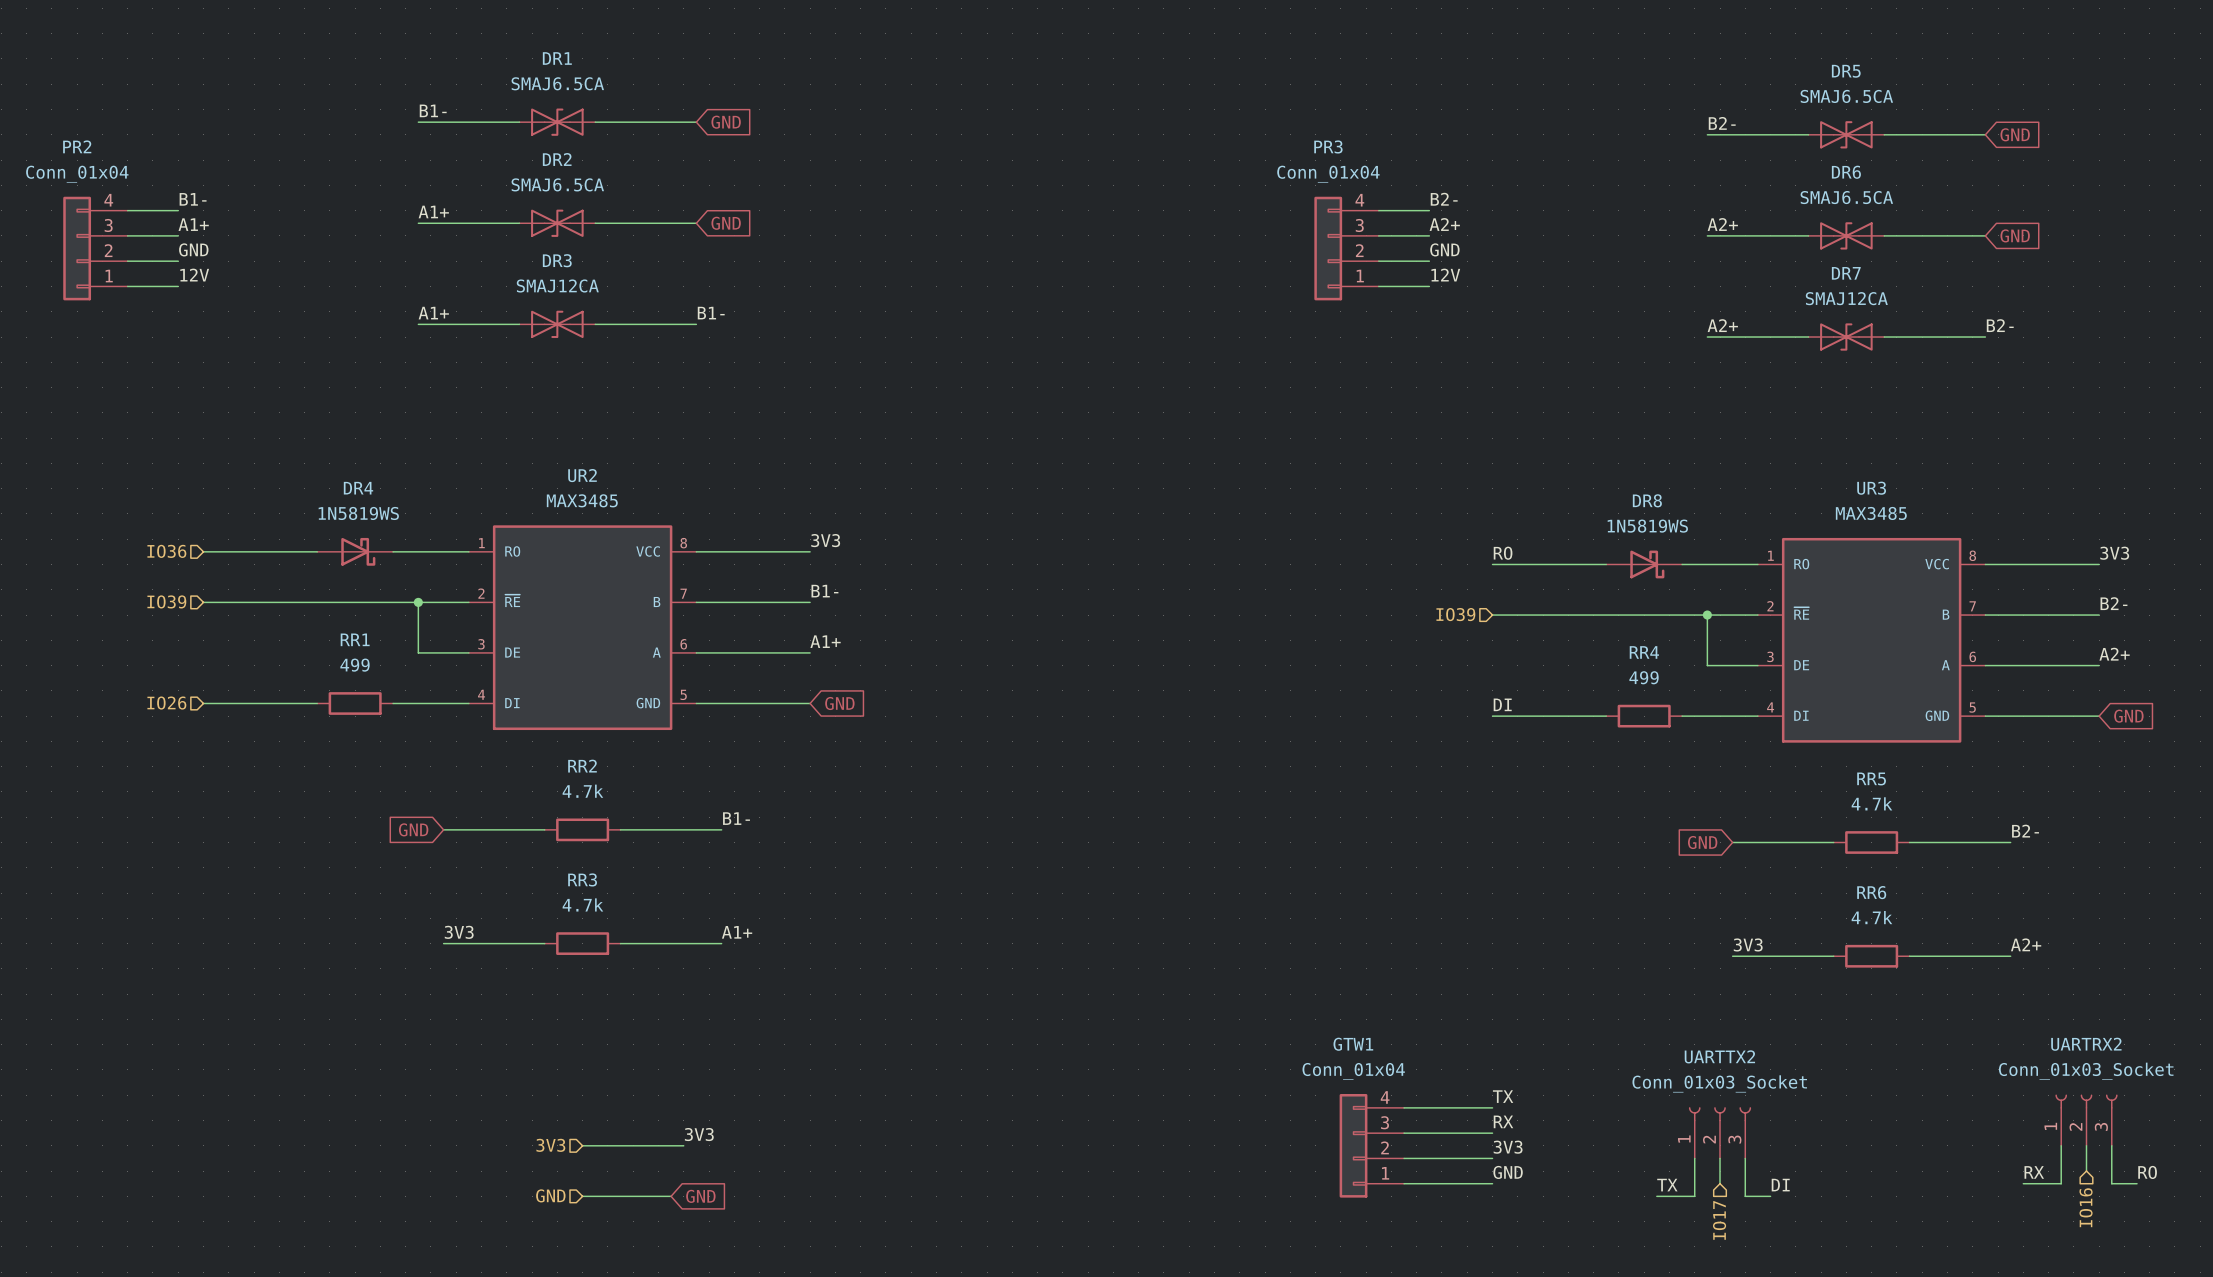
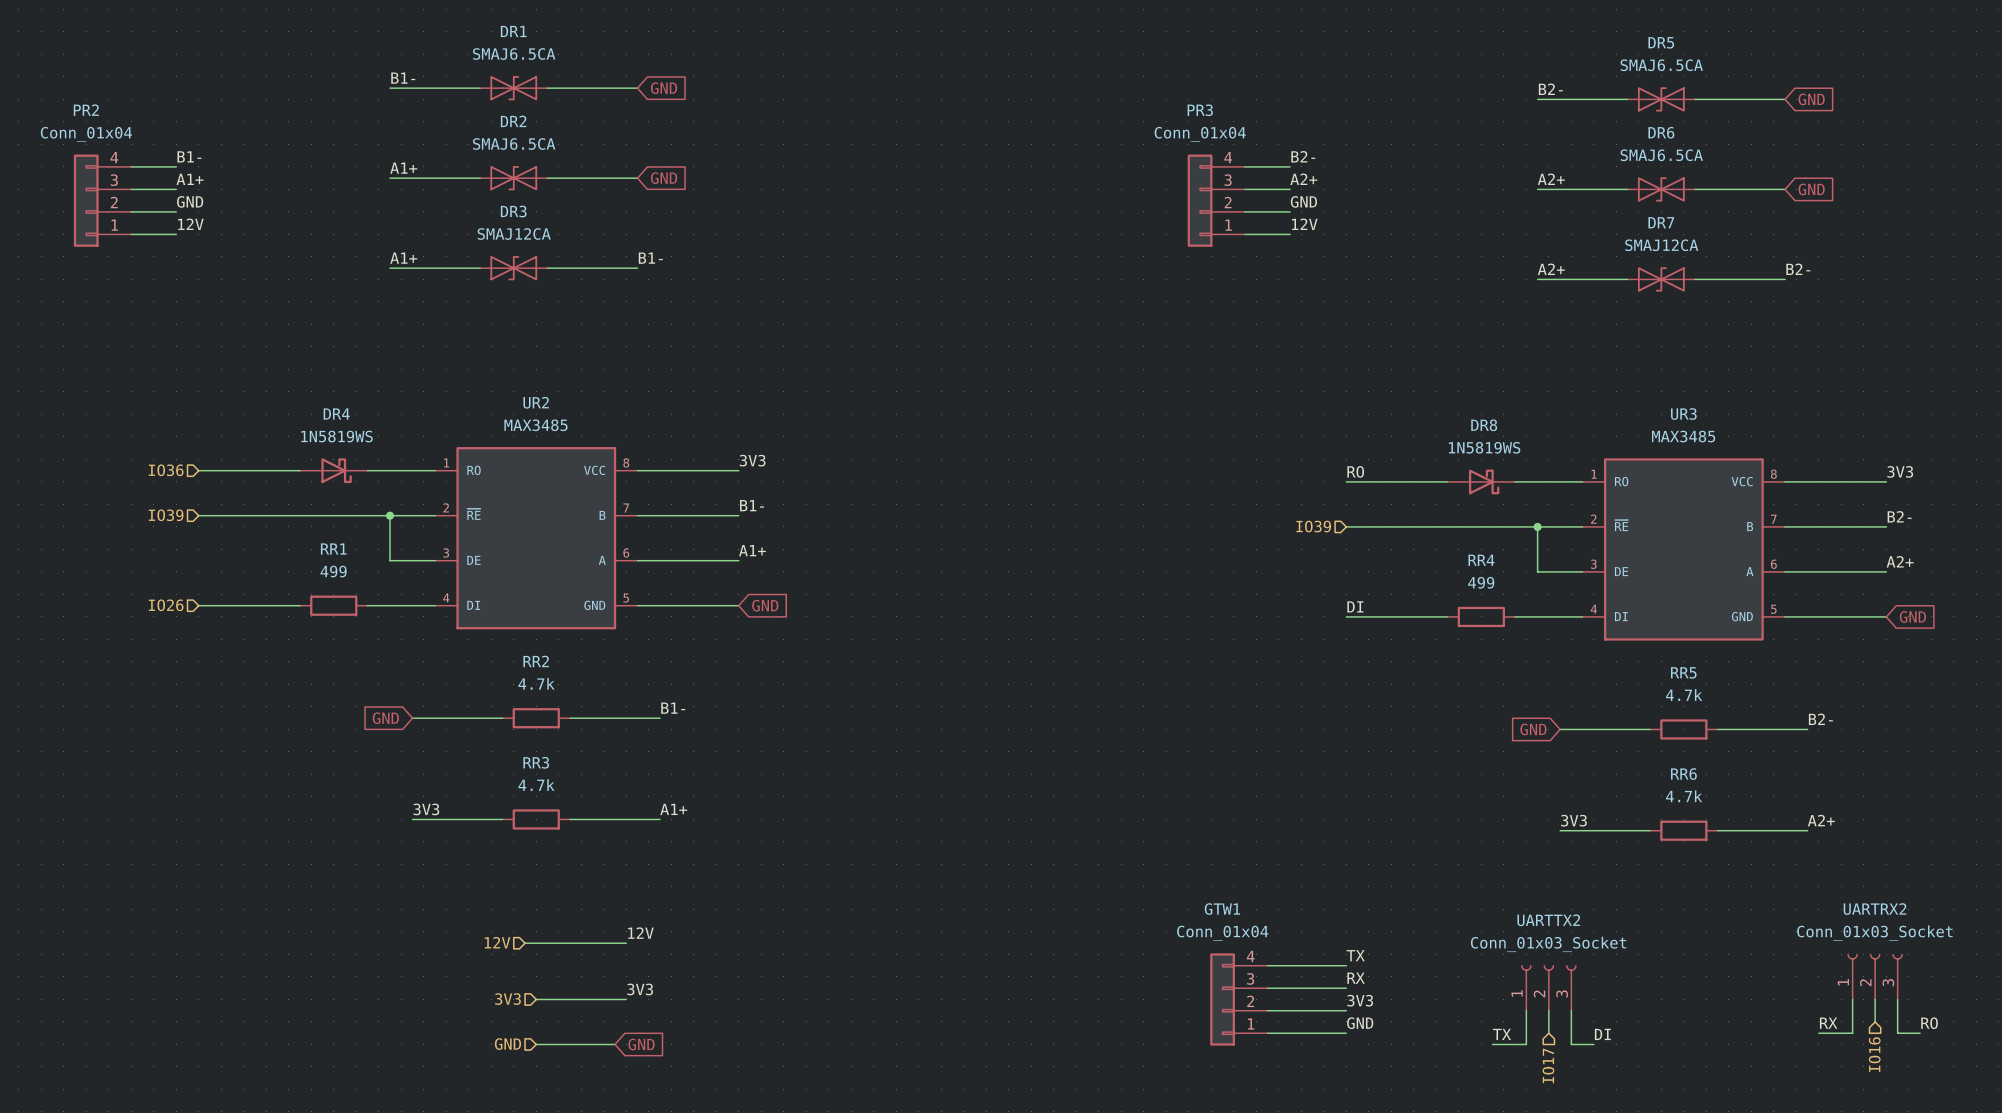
label: none -> 12V (640, 933)
hierarchical label: none -> 12V (497, 942)
wire: none -> (525, 943) (626, 943)

